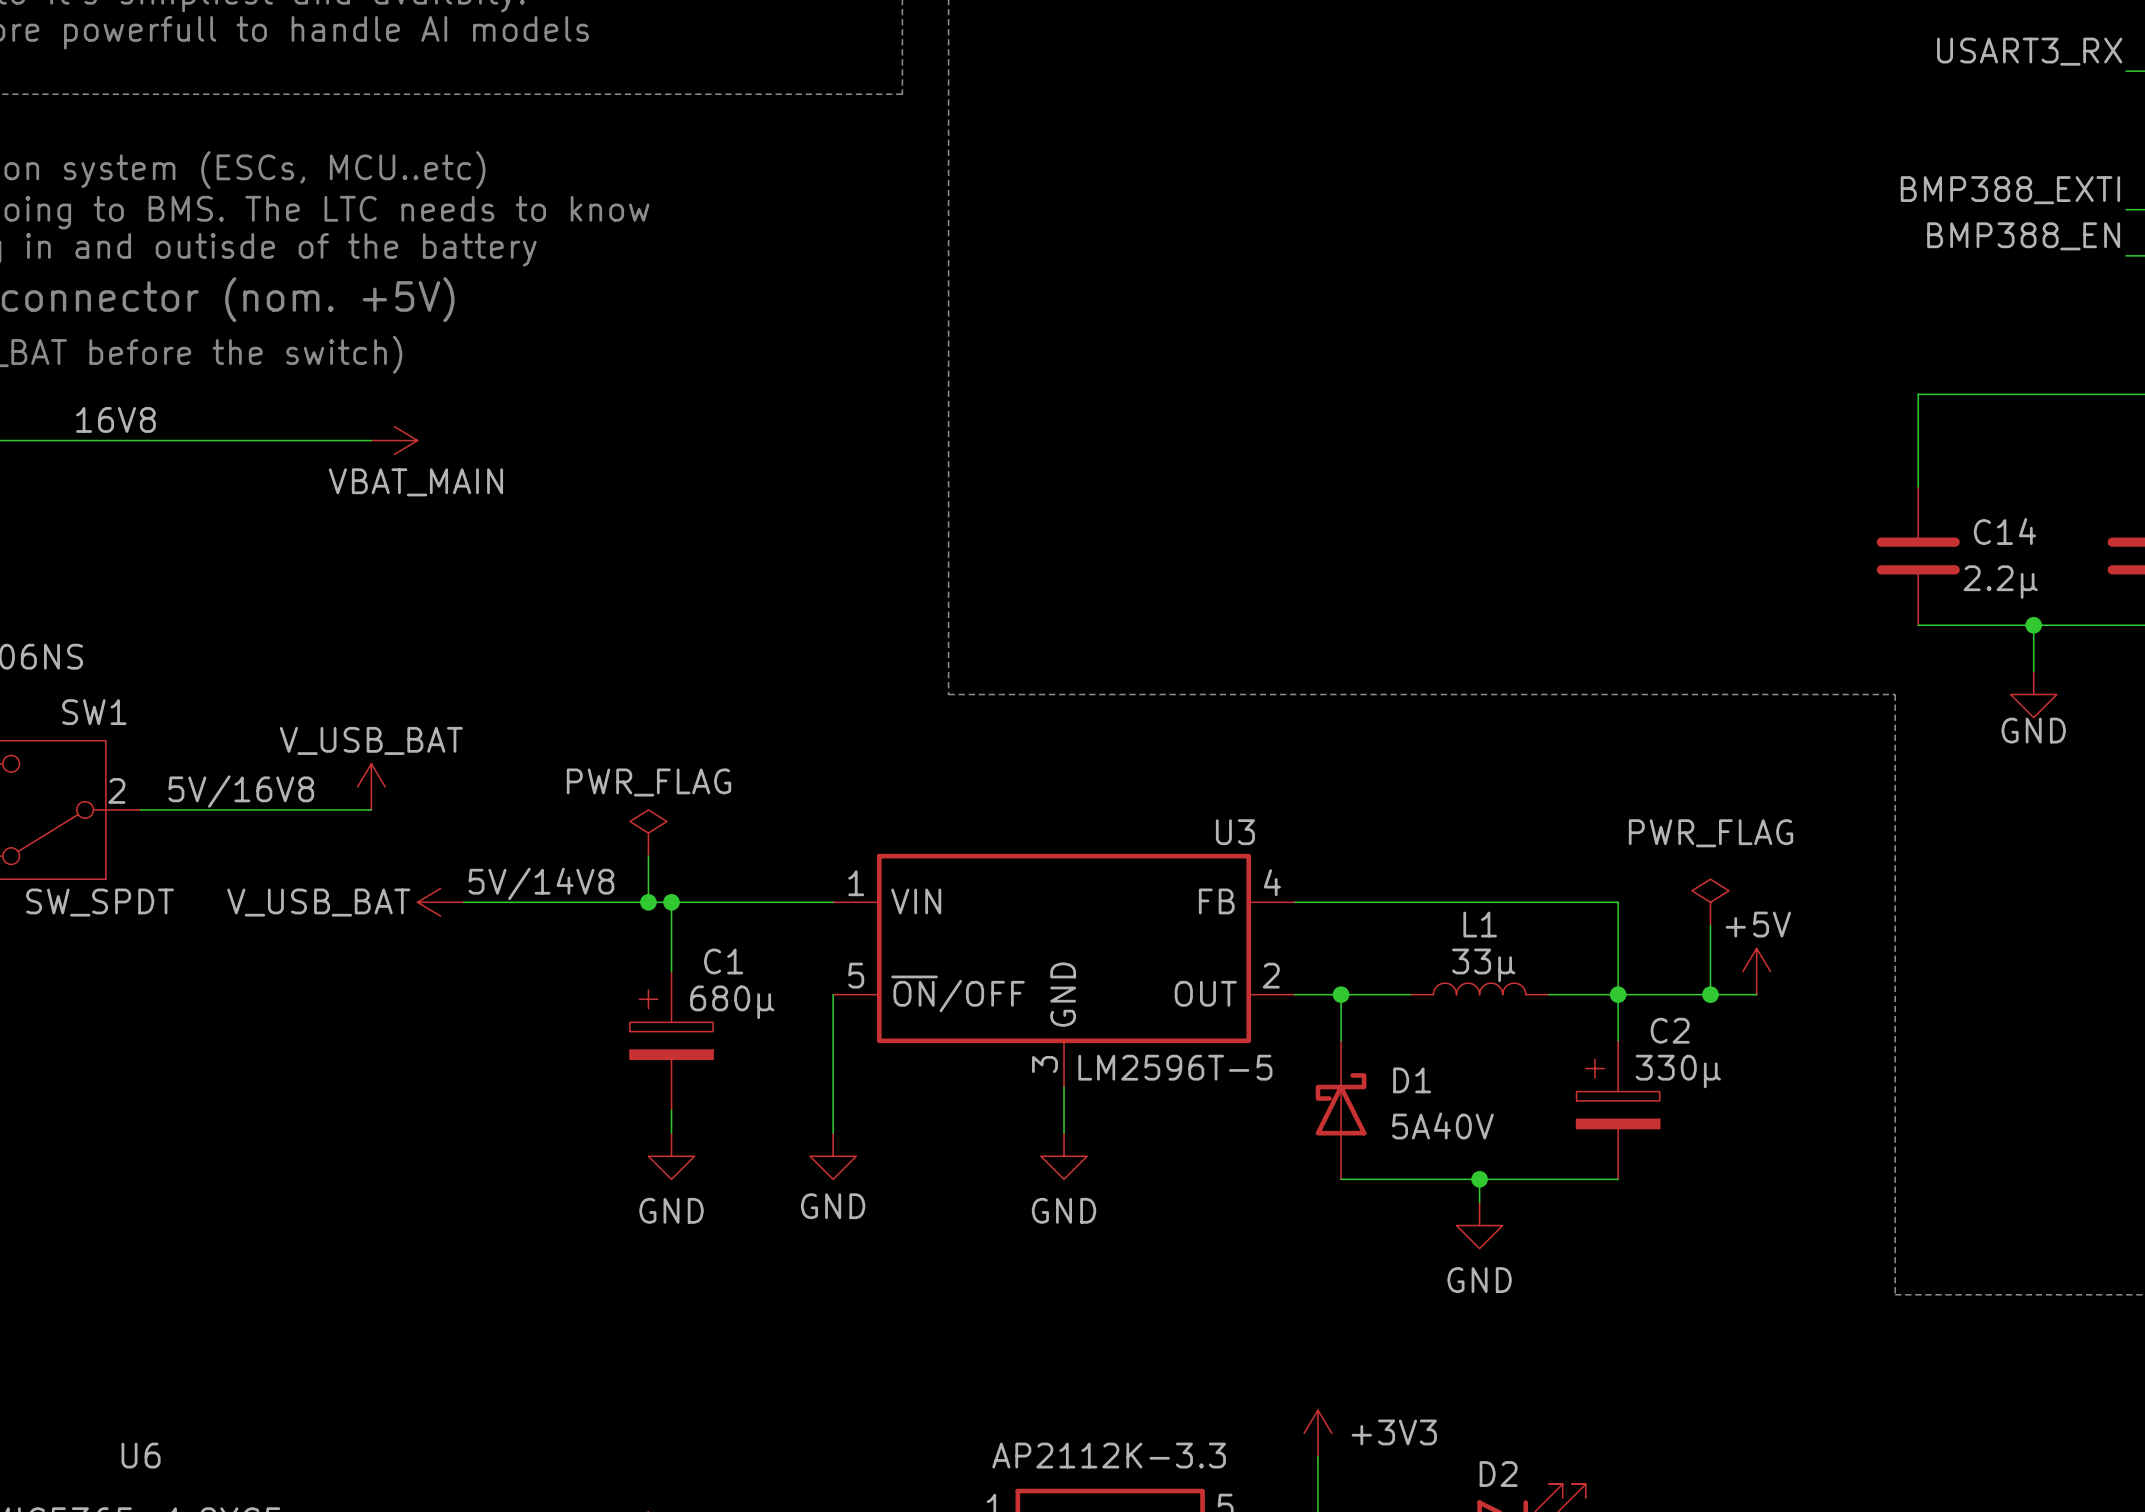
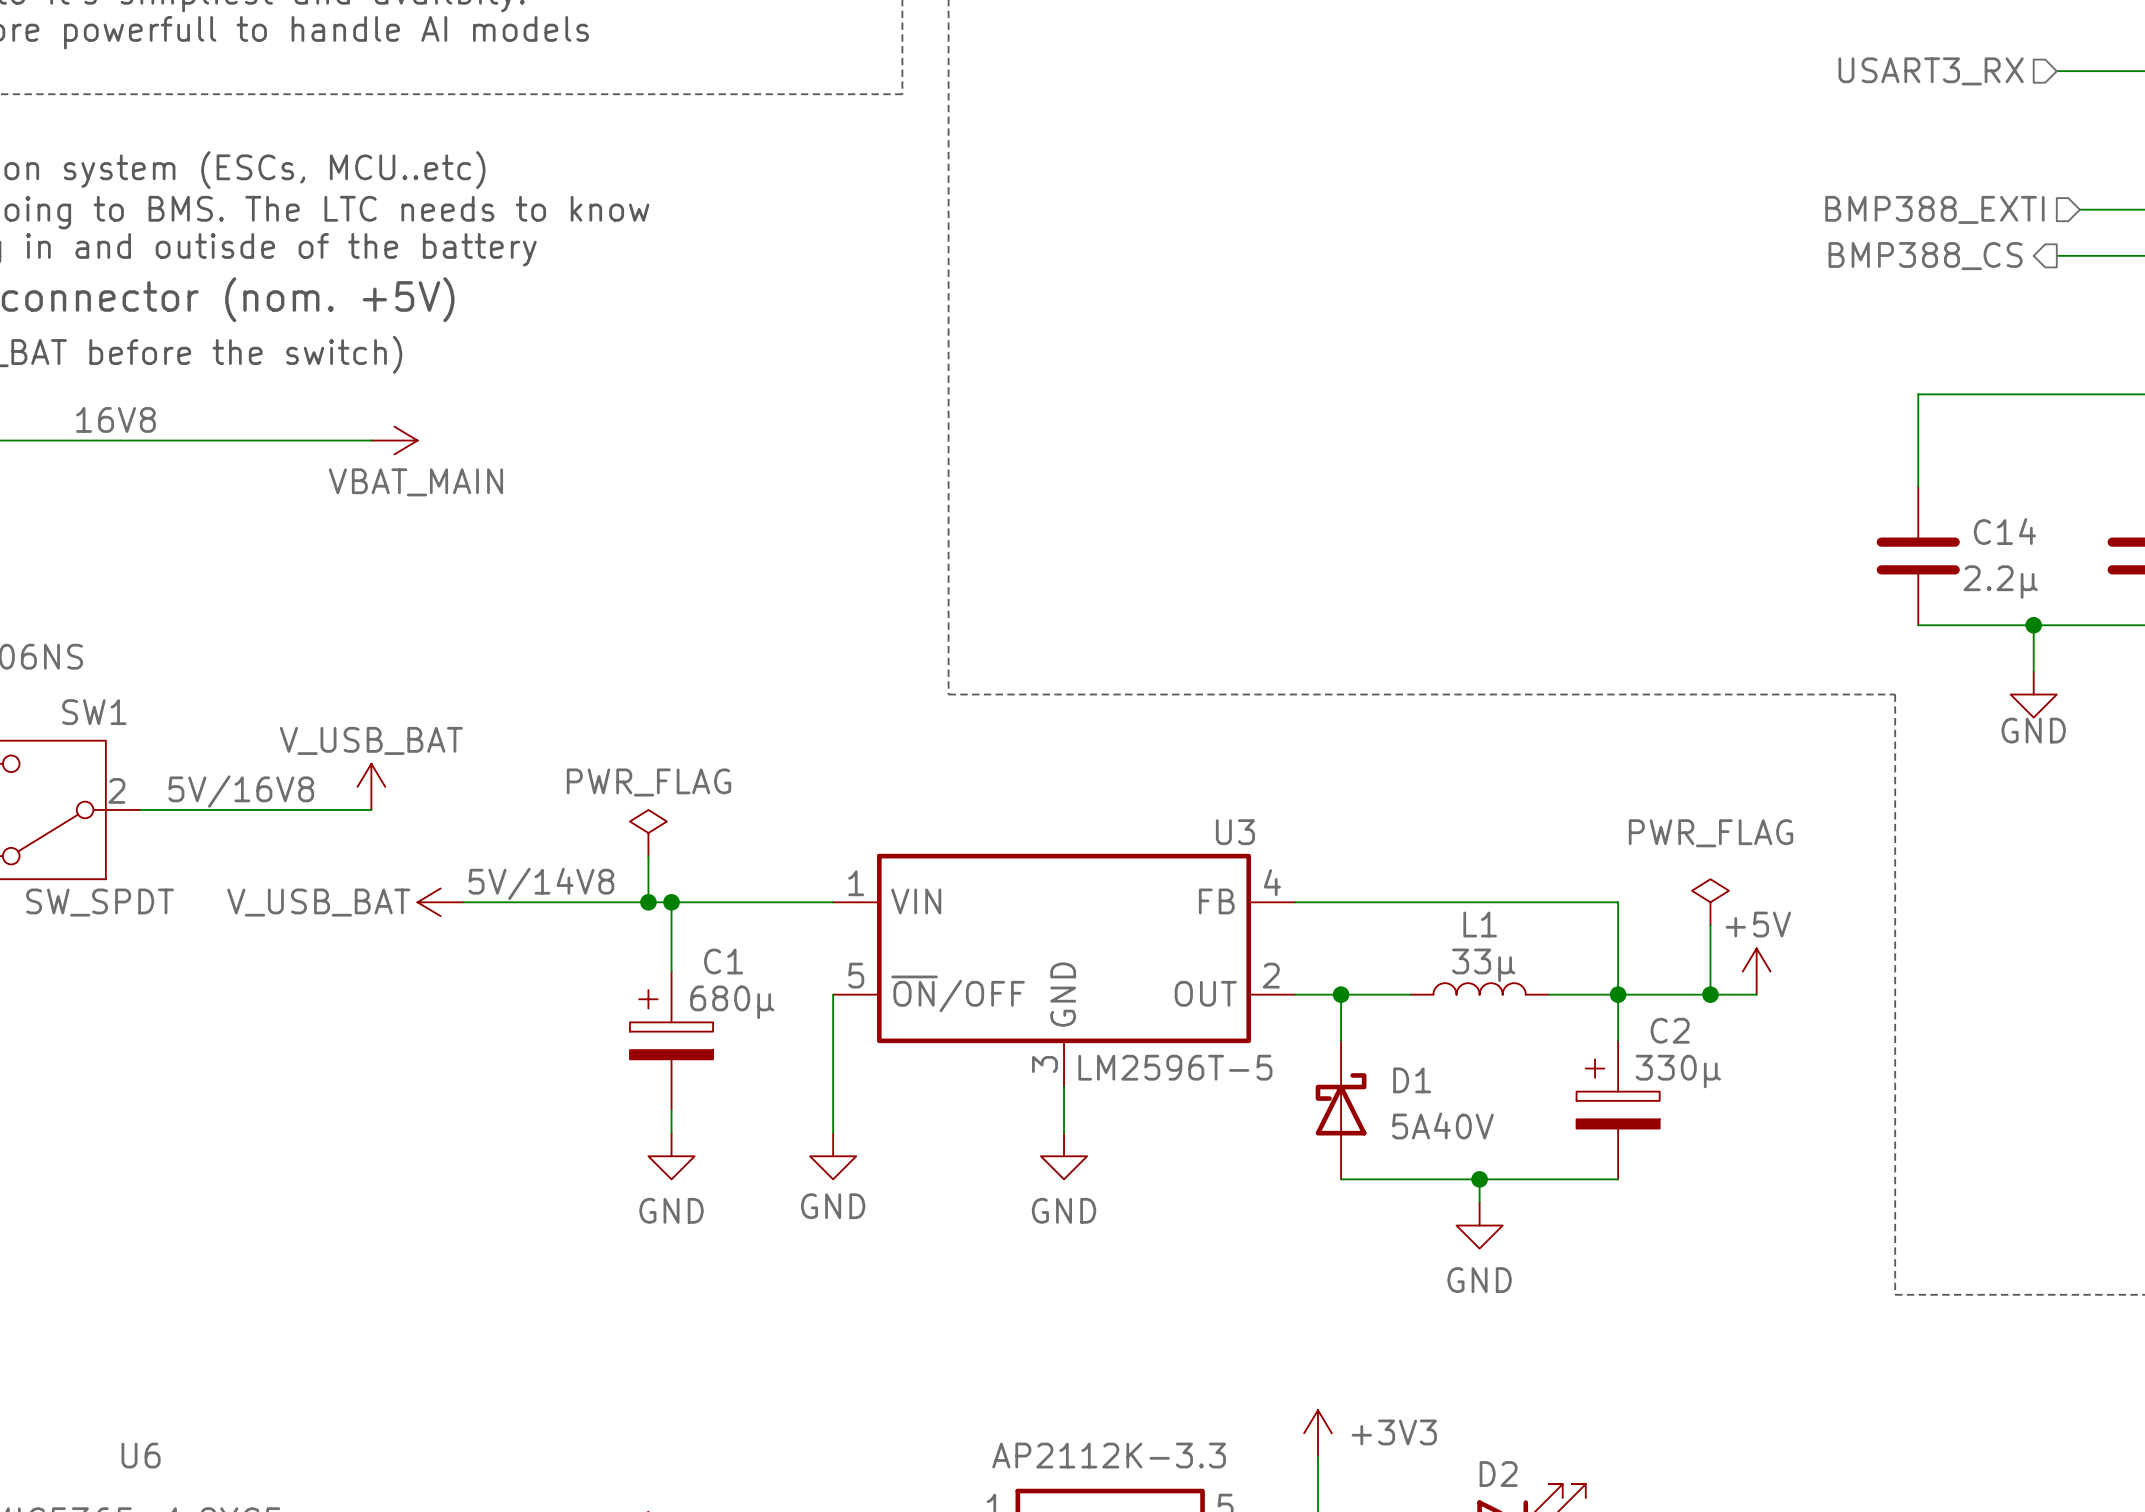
label: USART3_RX (2029, 51) -> none
hierarchical label: none -> USART3_RX (1931, 71)
wire: none -> (2056, 71) (2126, 71)
label: BMP388_EXTI (2010, 190) -> none
hierarchical label: none -> BMP388_EXTI (1934, 209)
wire: none -> (2079, 209) (2126, 209)
label: BMP388_EN (2023, 236) -> none
wire: none -> (2056, 255) (2126, 255)
hierarchical label: none -> BMP388_CS (1925, 256)

